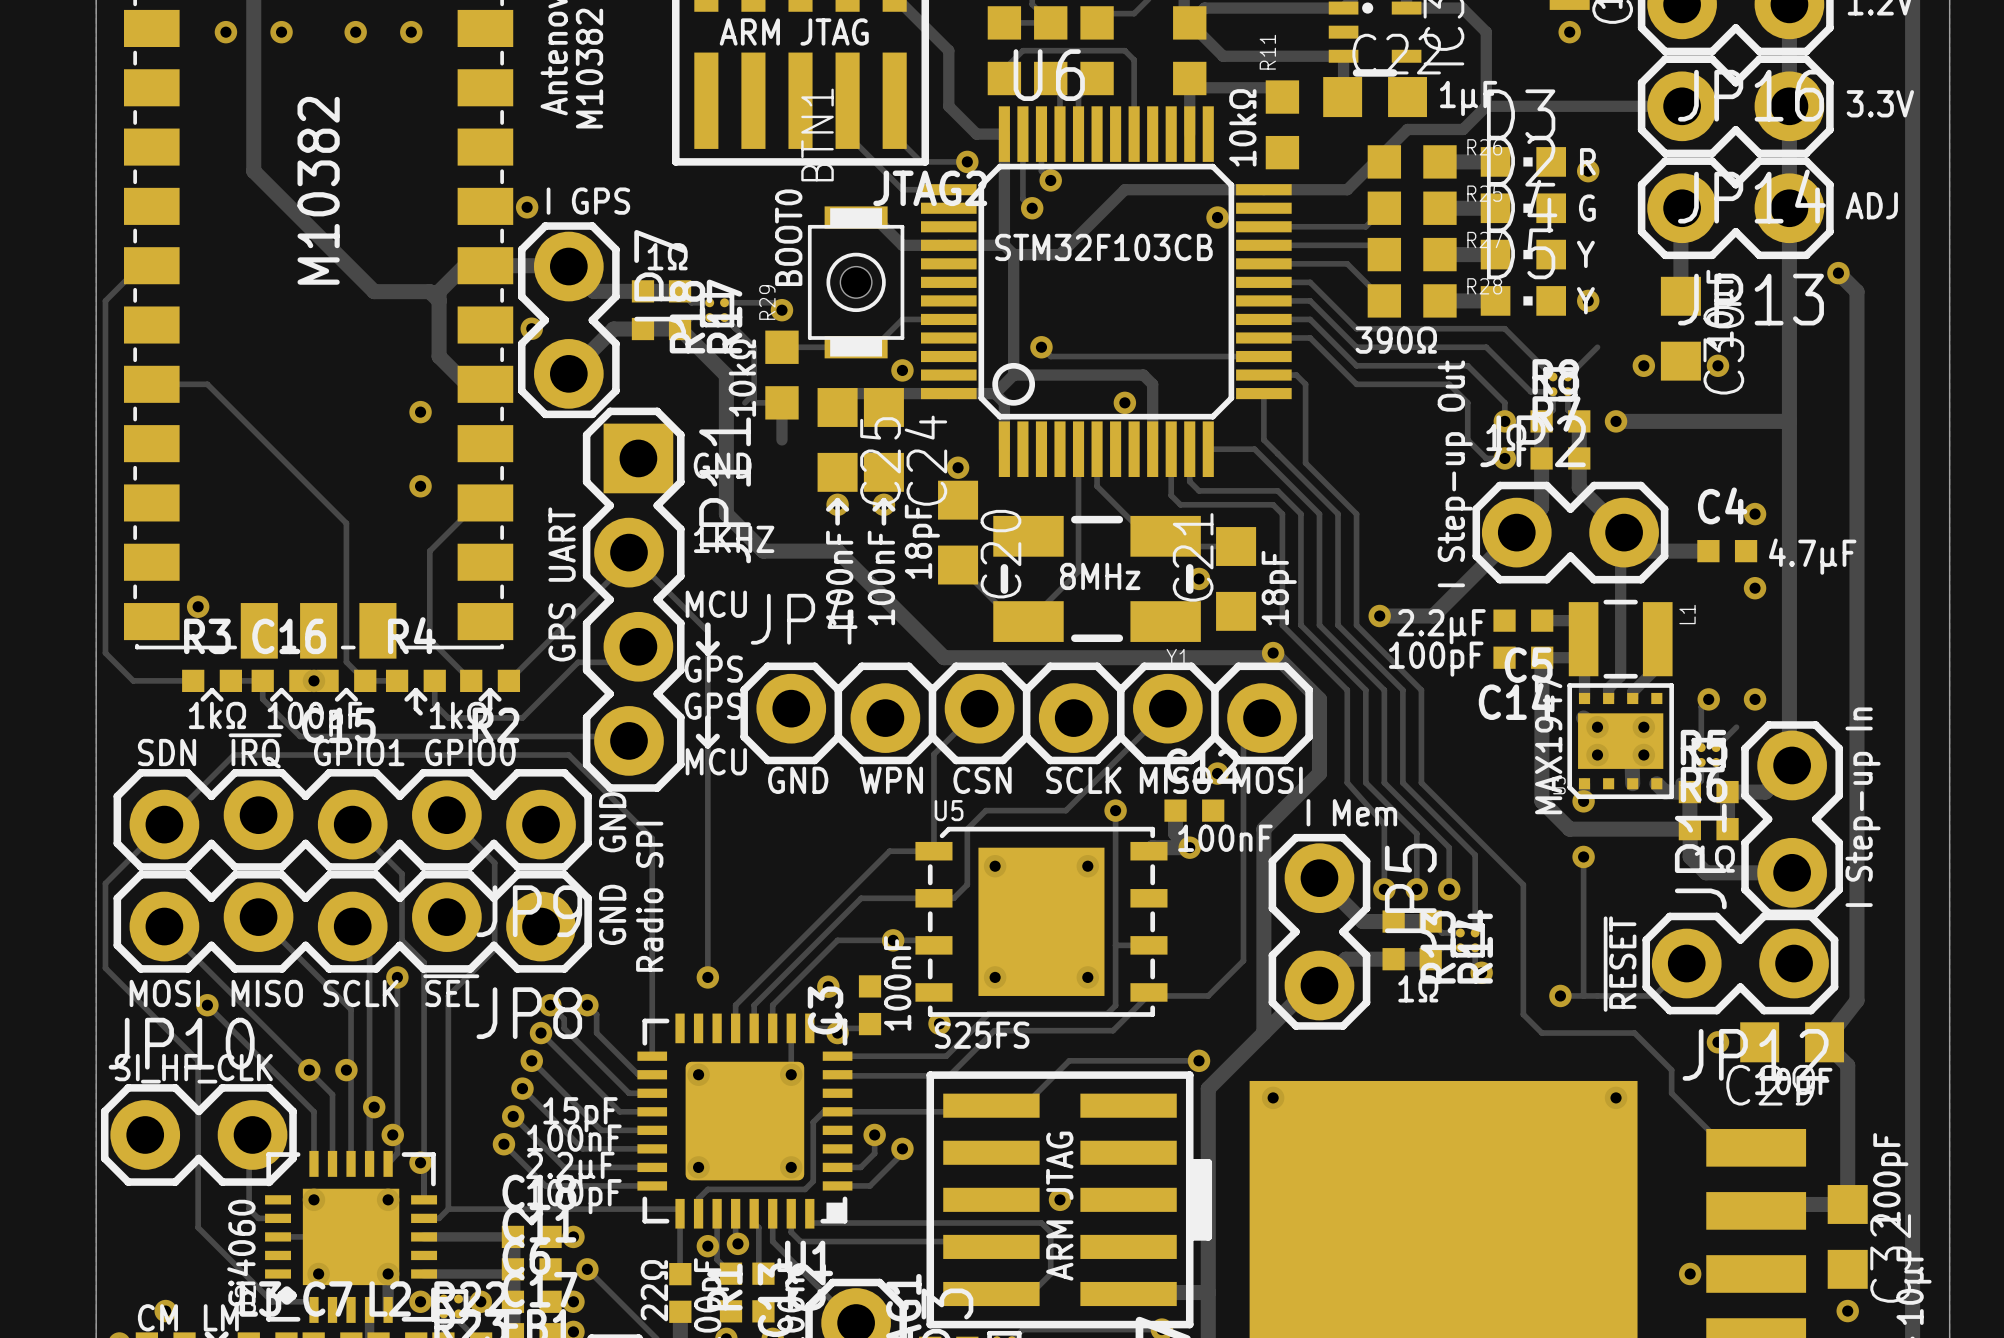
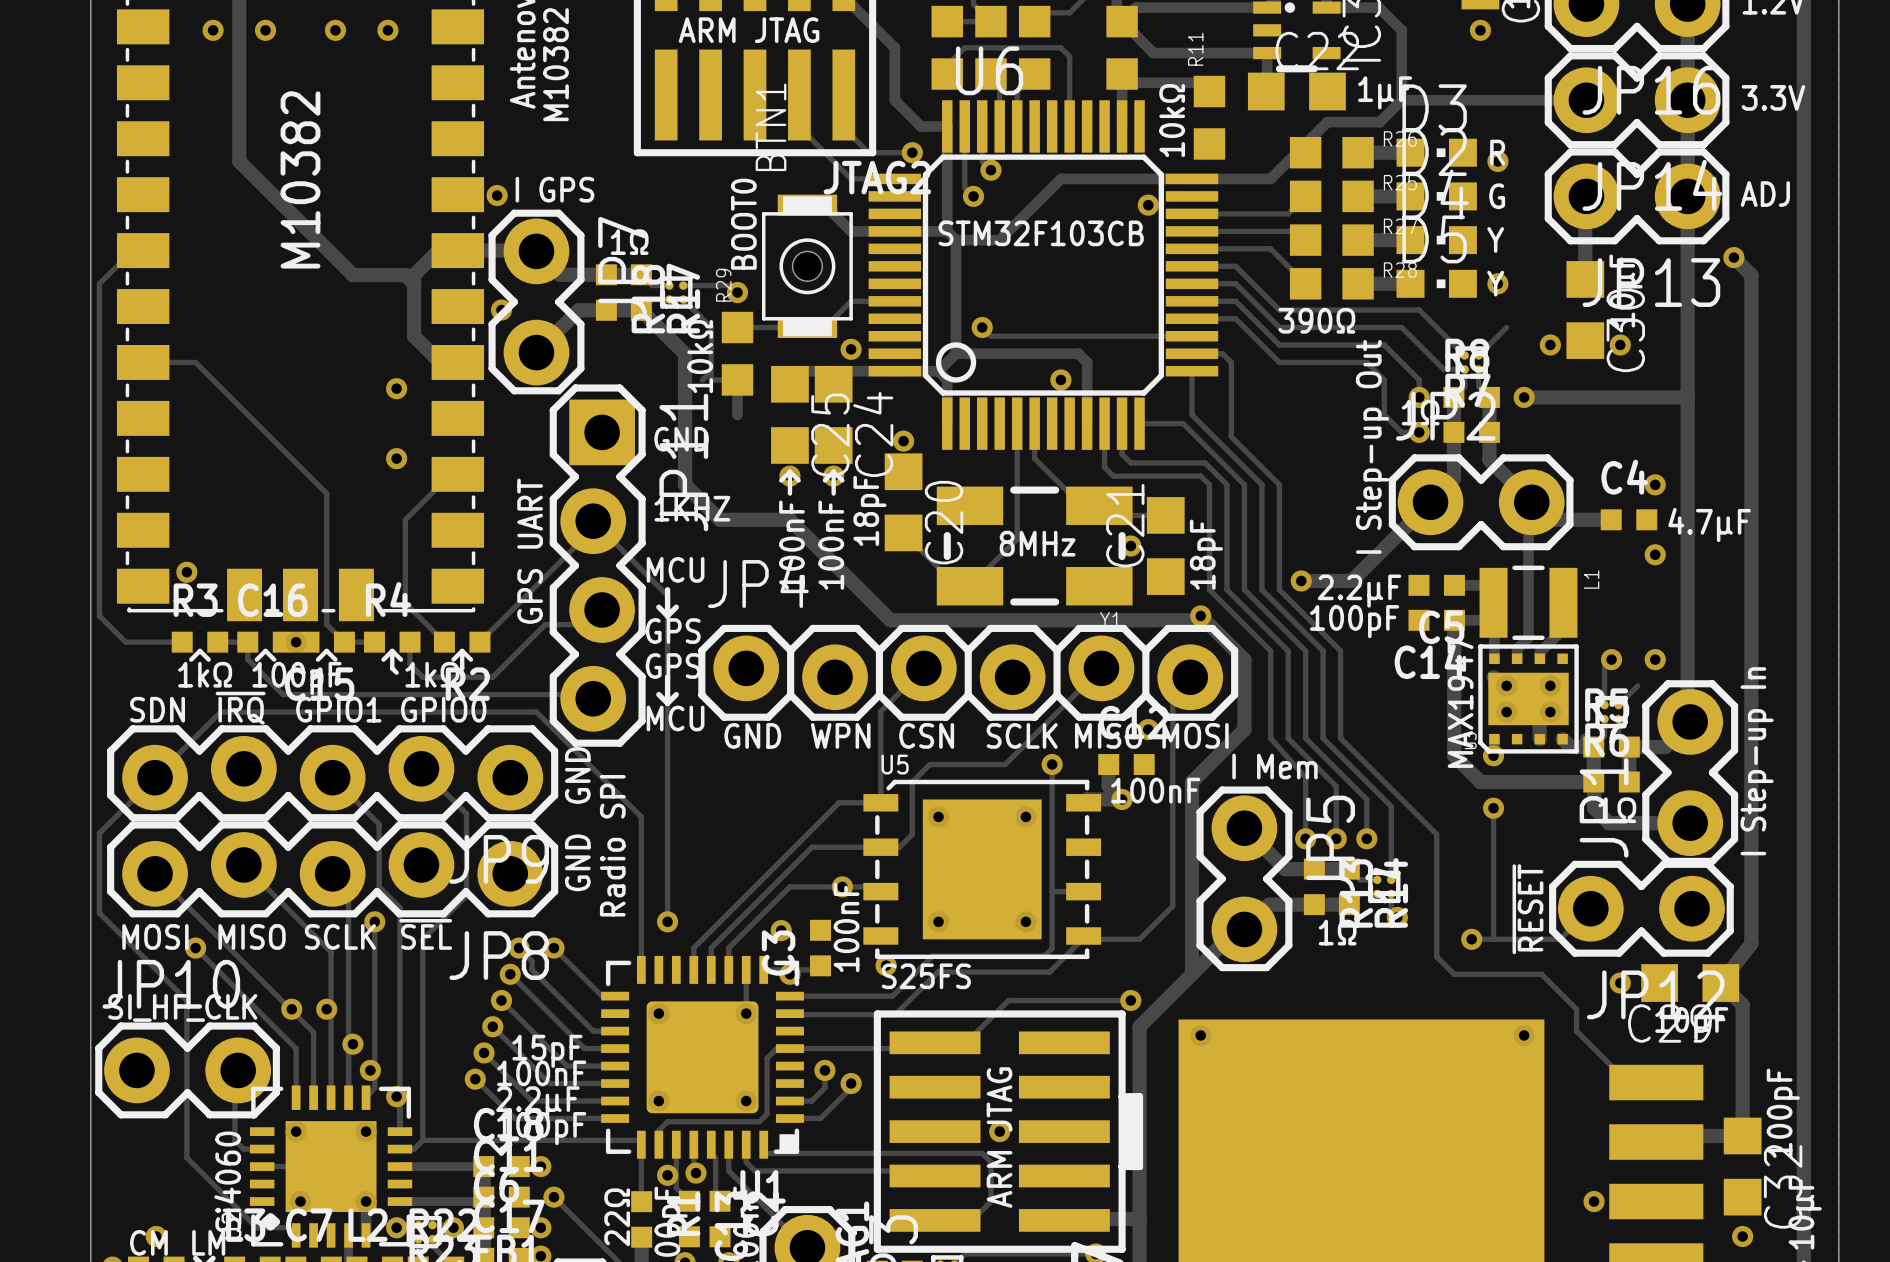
track: (652, 838) (652, 1056) -> (615, 790) (641, 816) (641, 969)
track: (596, 1014) (596, 1033) (638, 1074) (652, 1074) -> (562, 956) (602, 996) (615, 996)

